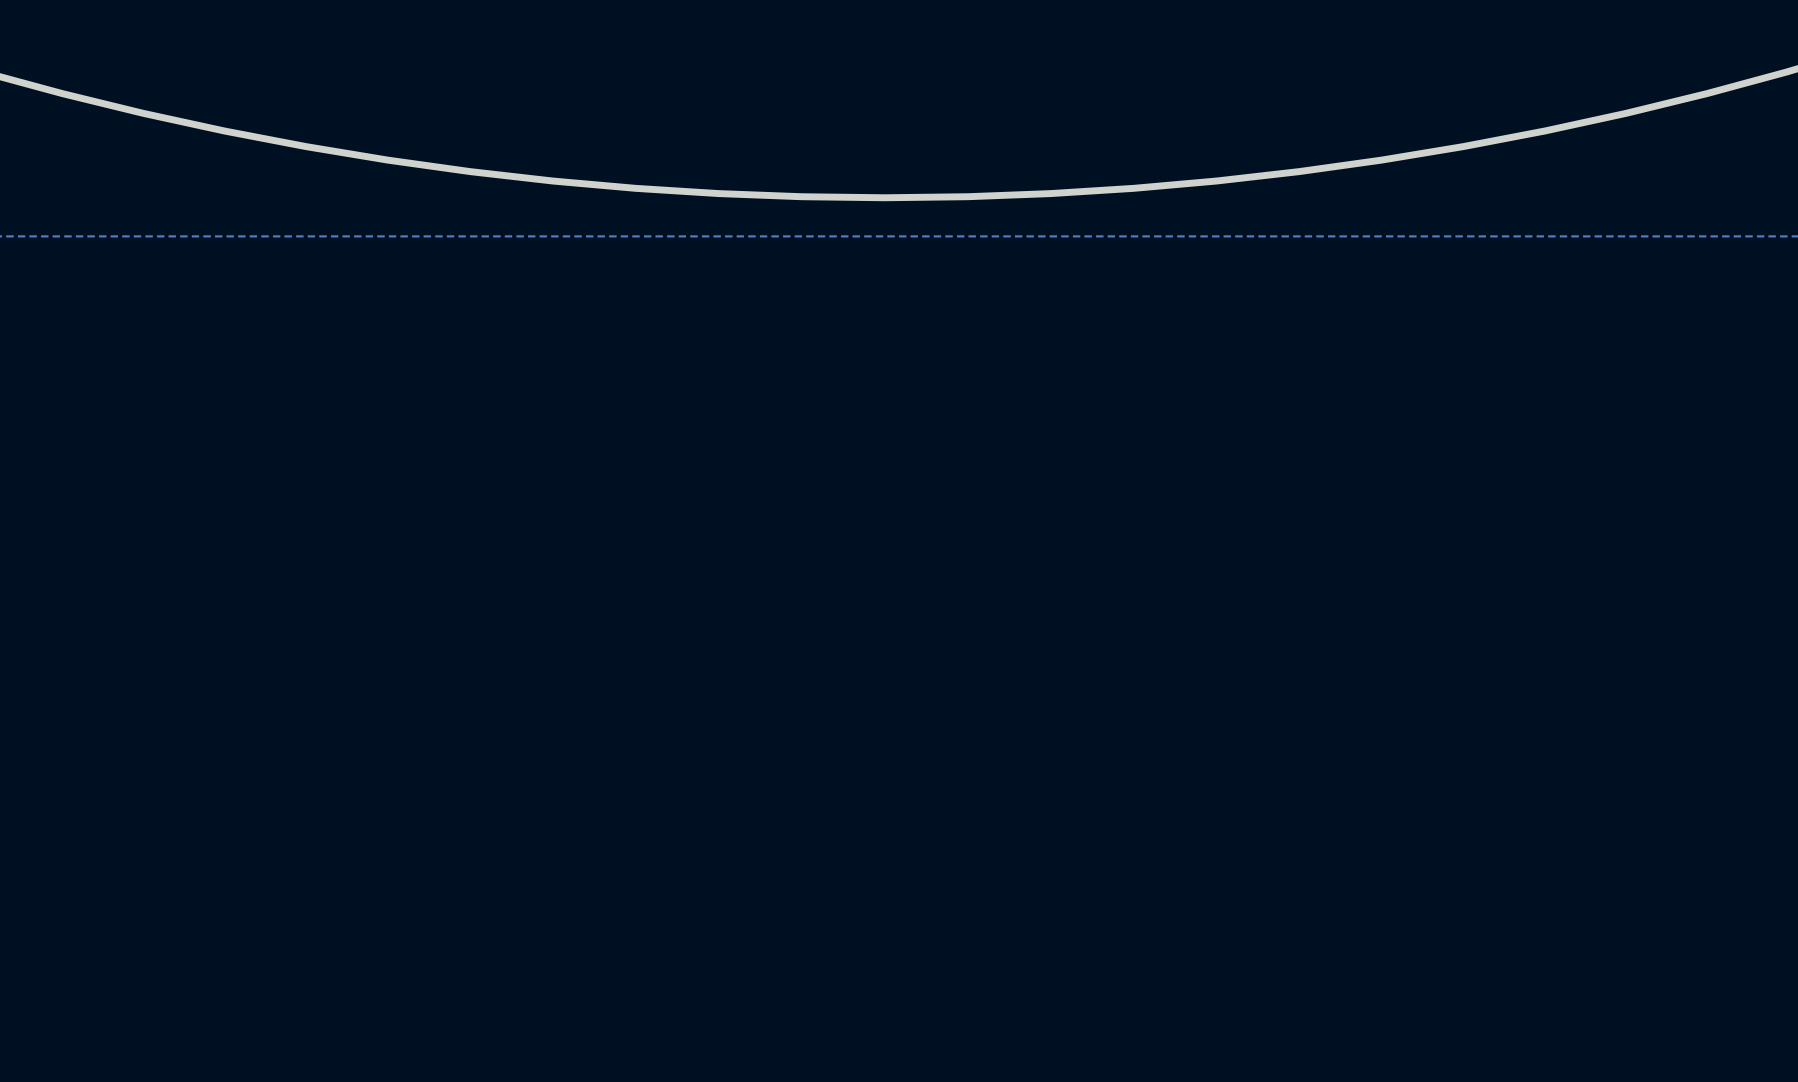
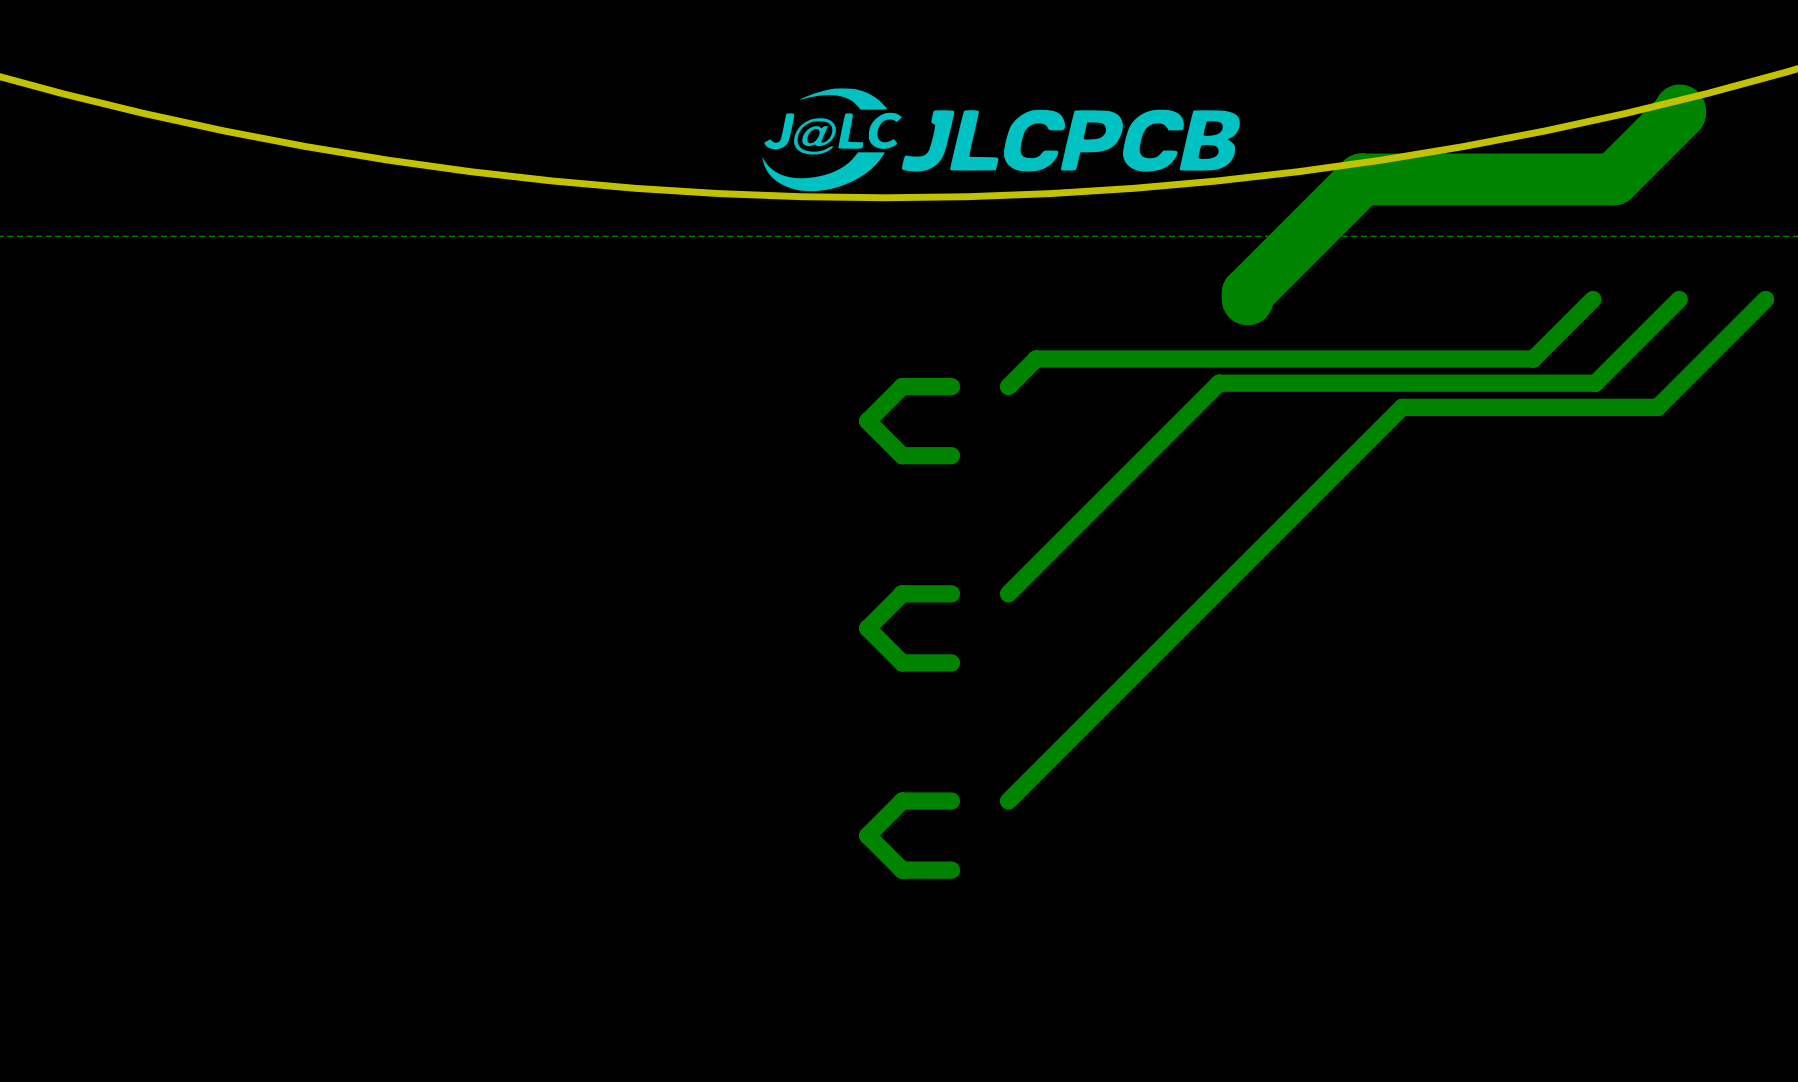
drawing: none -> [762, 88, 1240, 192]
bottom track: none -> (1679, 110) (1679, 112) (1613, 179) (1361, 179) (1247, 293) (1247, 299)
bottom track: none -> (1592, 299) (1533, 359) (1036, 359) (1008, 386)
bottom track: none -> (1679, 299) (1595, 383) (1219, 383) (1008, 593)
bottom track: none -> (1765, 299) (1657, 407) (1402, 407) (1008, 801)
bottom track: none -> (951, 386) (902, 386) (867, 421) (902, 455) (951, 455)
bottom track: none -> (951, 593) (902, 593) (867, 628) (902, 662) (951, 662)
bottom track: none -> (951, 801) (902, 801) (867, 835) (902, 870) (951, 870)

